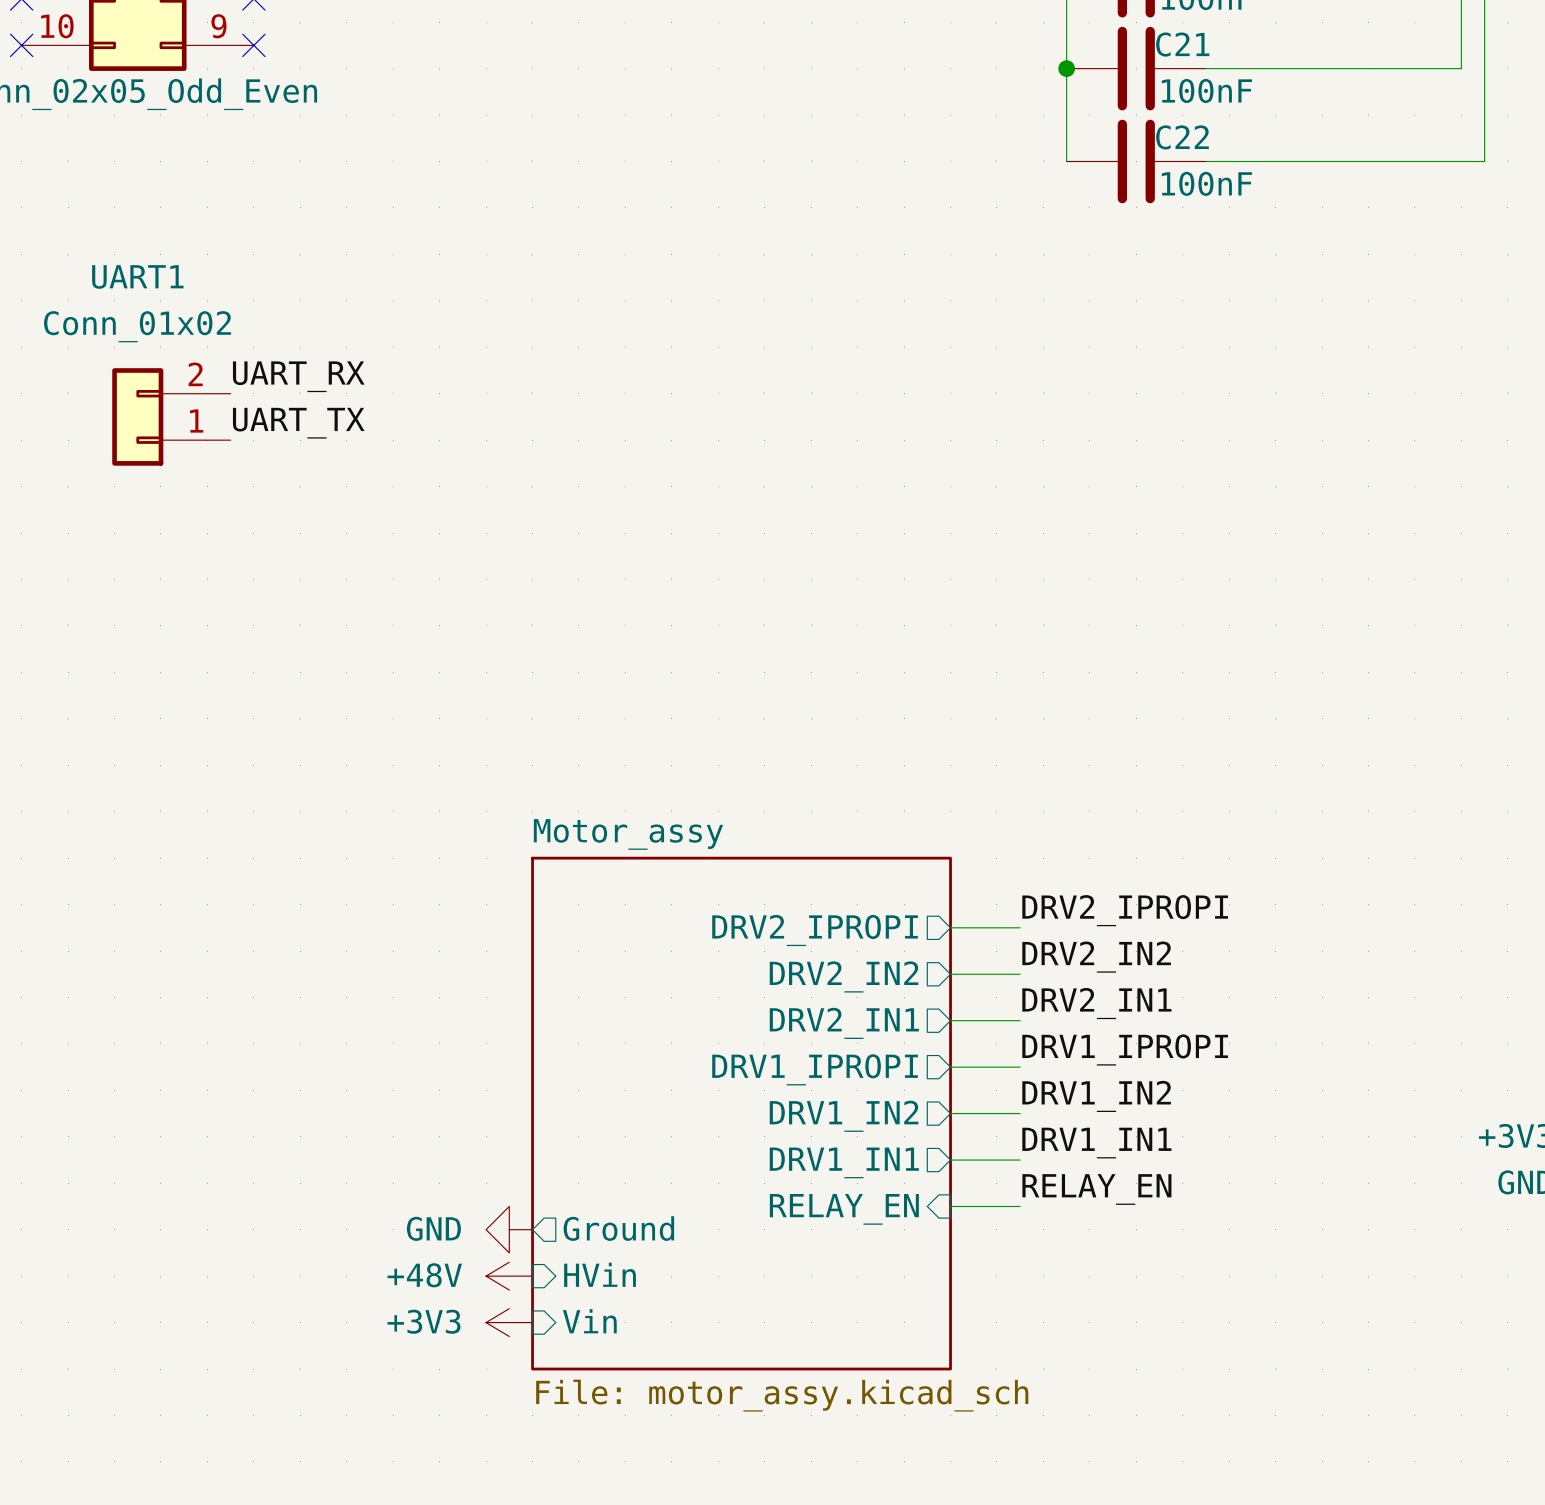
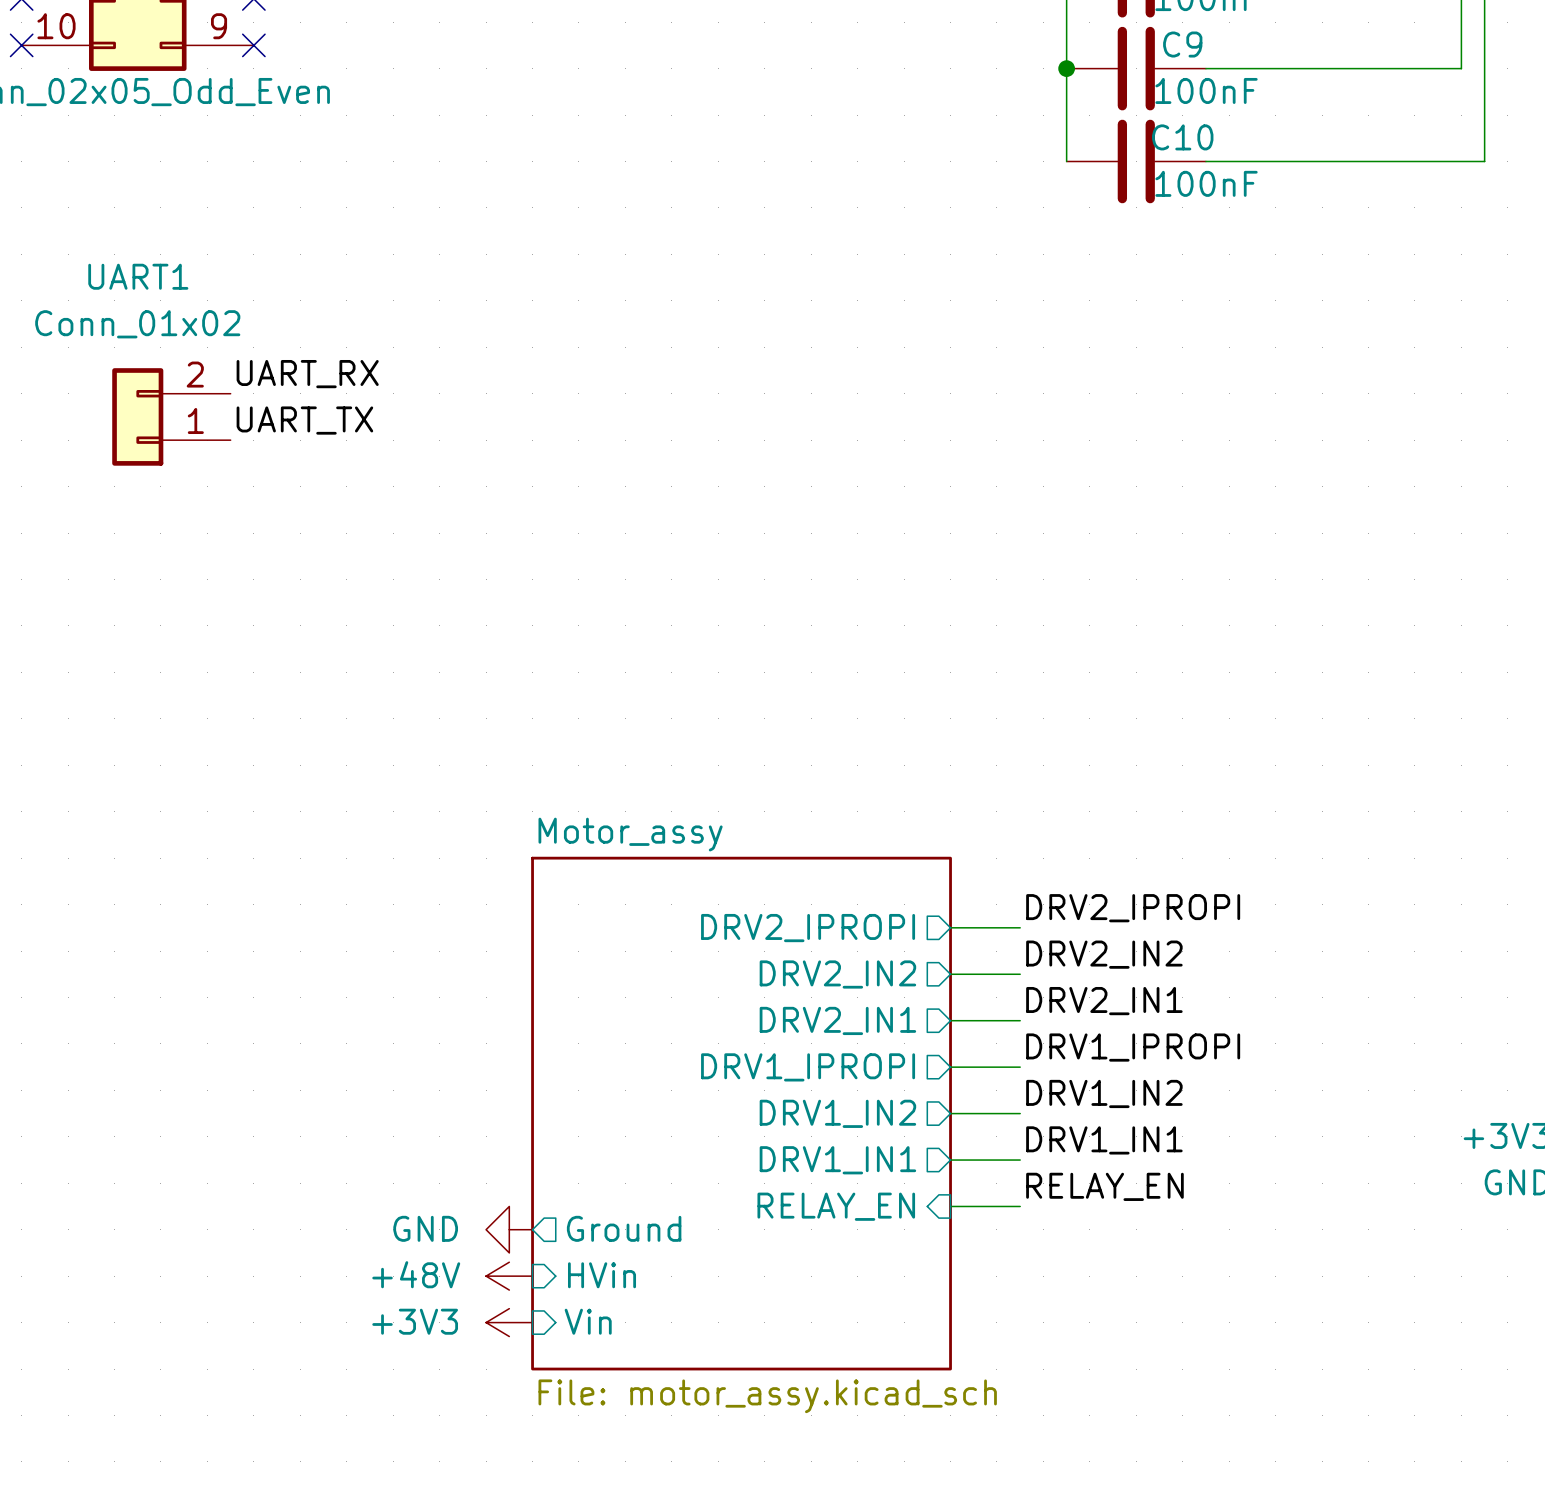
C21 name: C21 (1182, 44) -> C9 (1182, 44)
C22 name: C22 (1182, 137) -> C10 (1182, 137)

